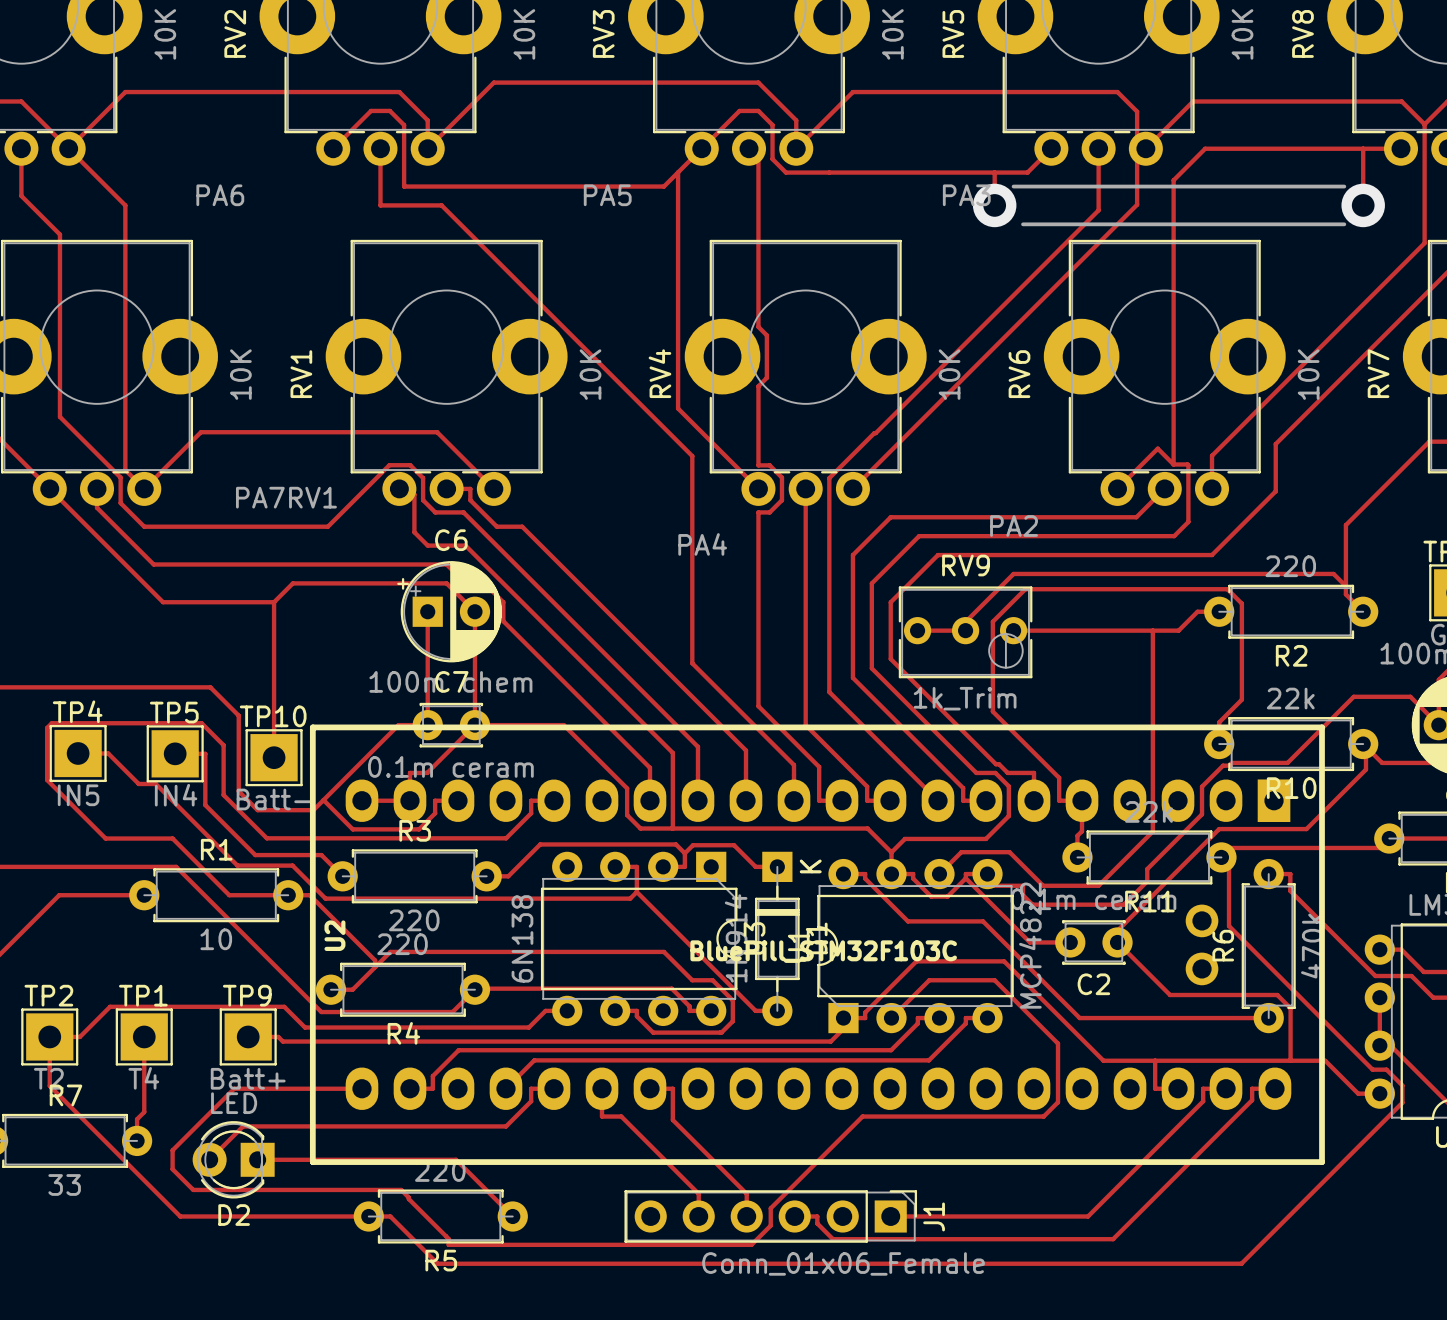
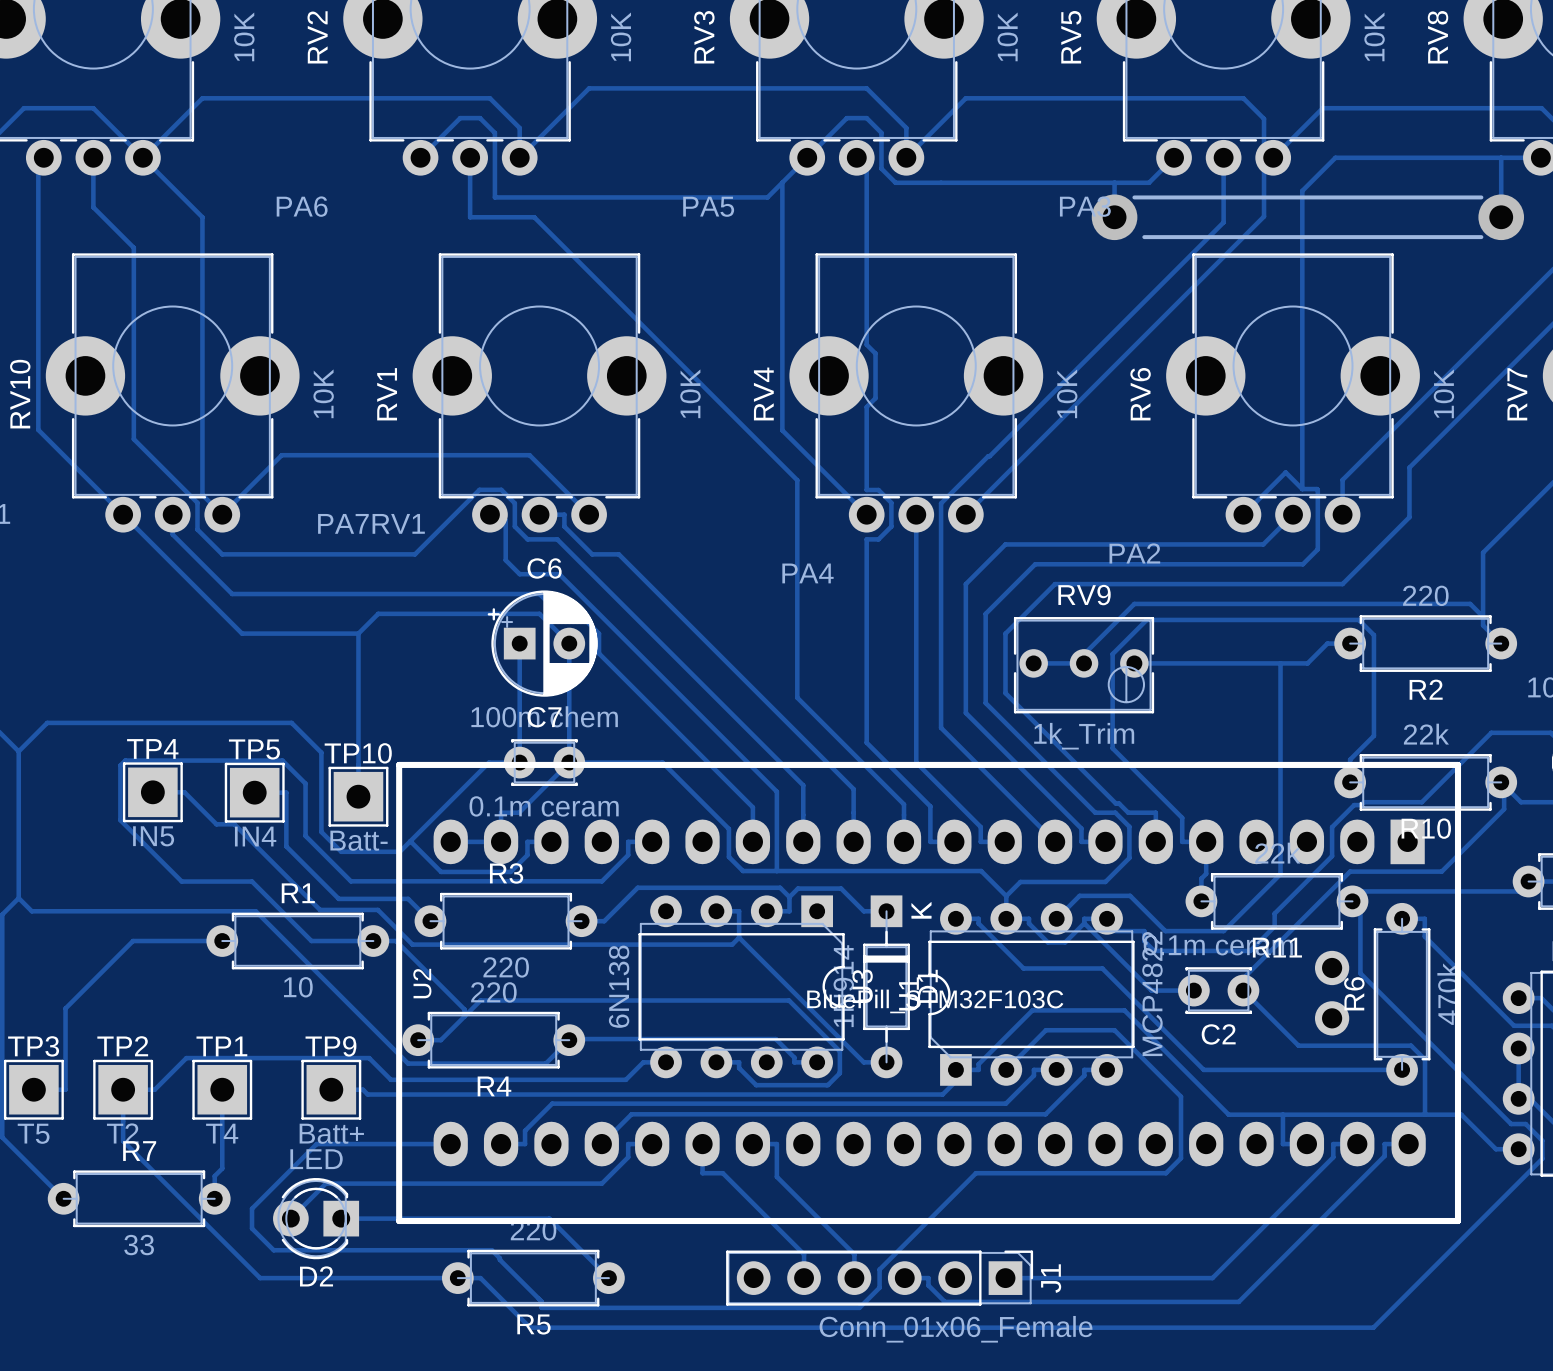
track: (663, 951) (692, 980) (712, 980) (732, 1000) -> (767, 1000) (789, 1000) (839, 1051)

